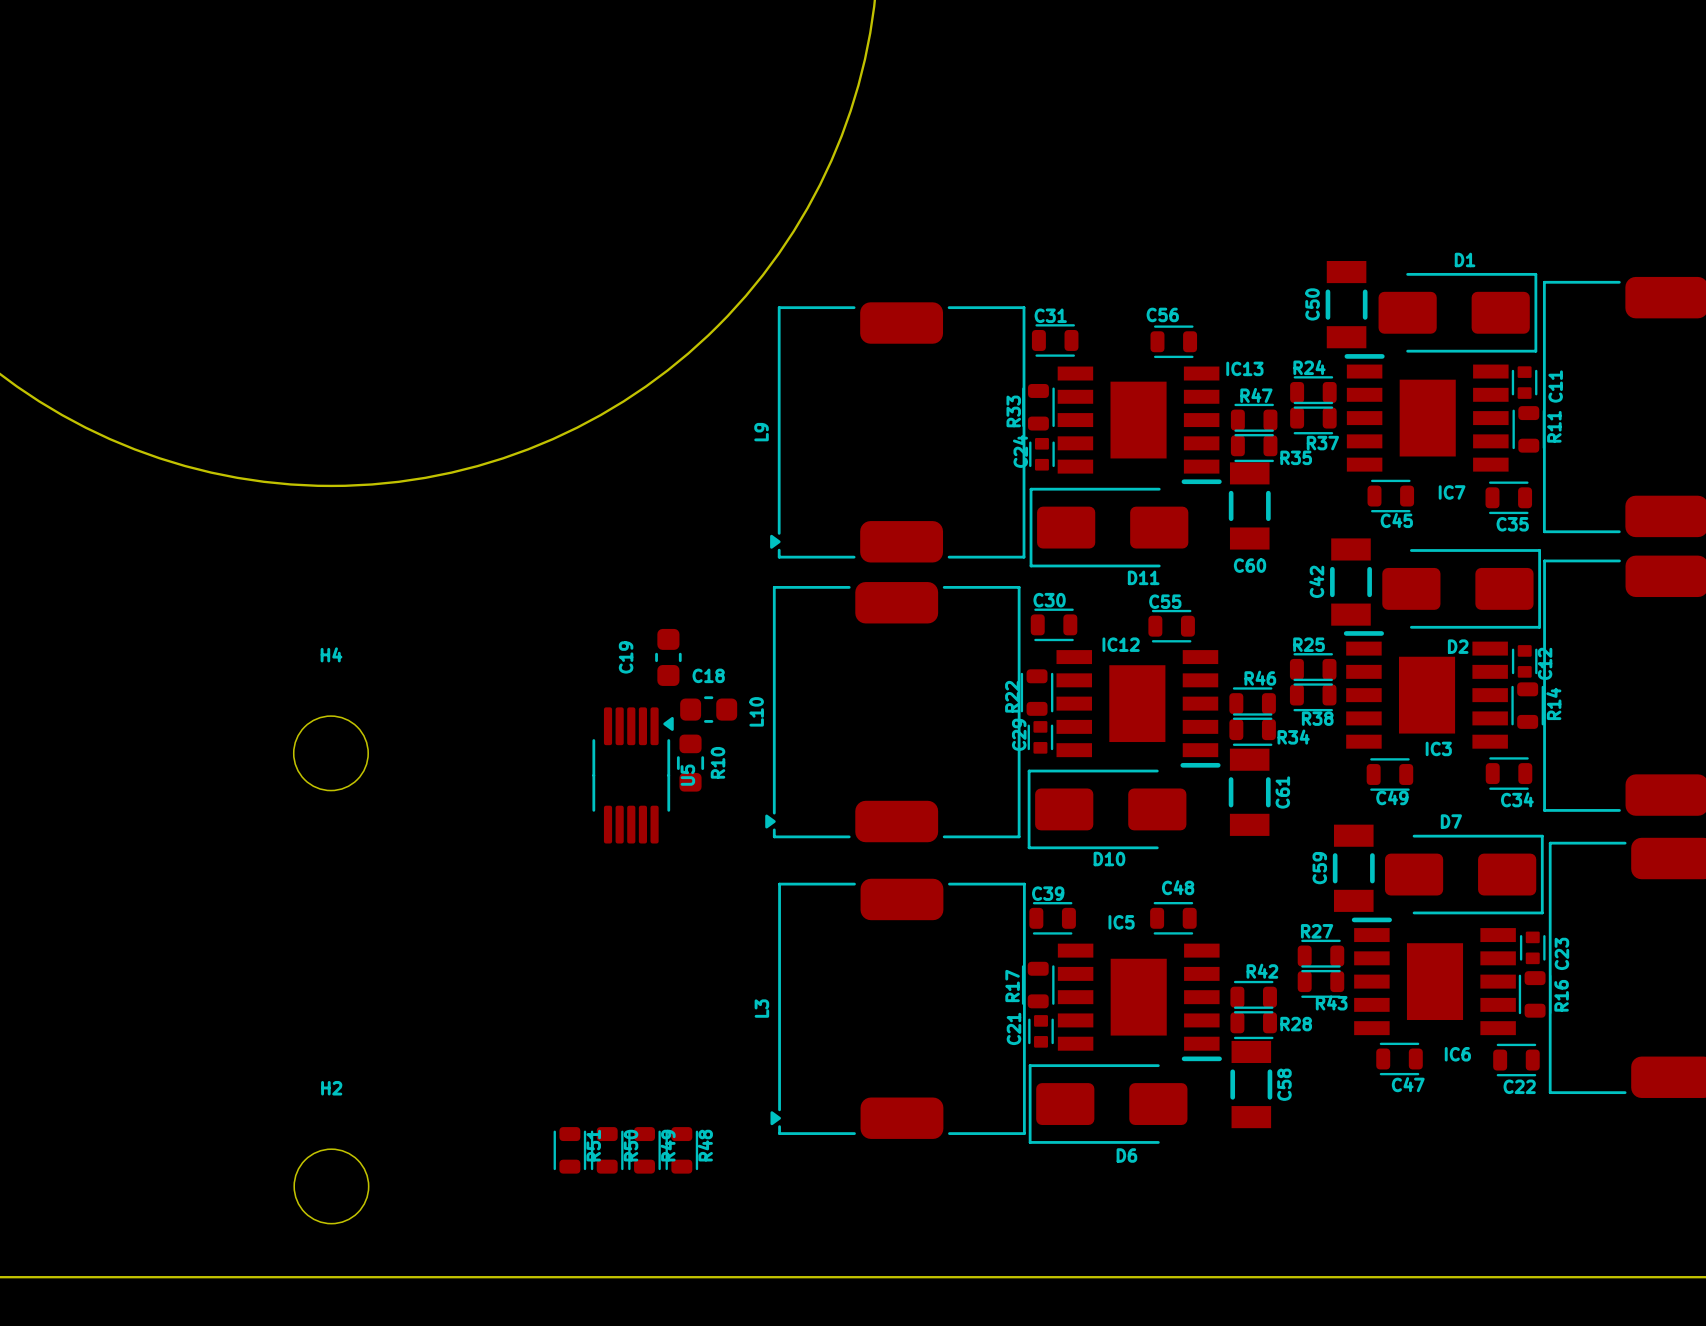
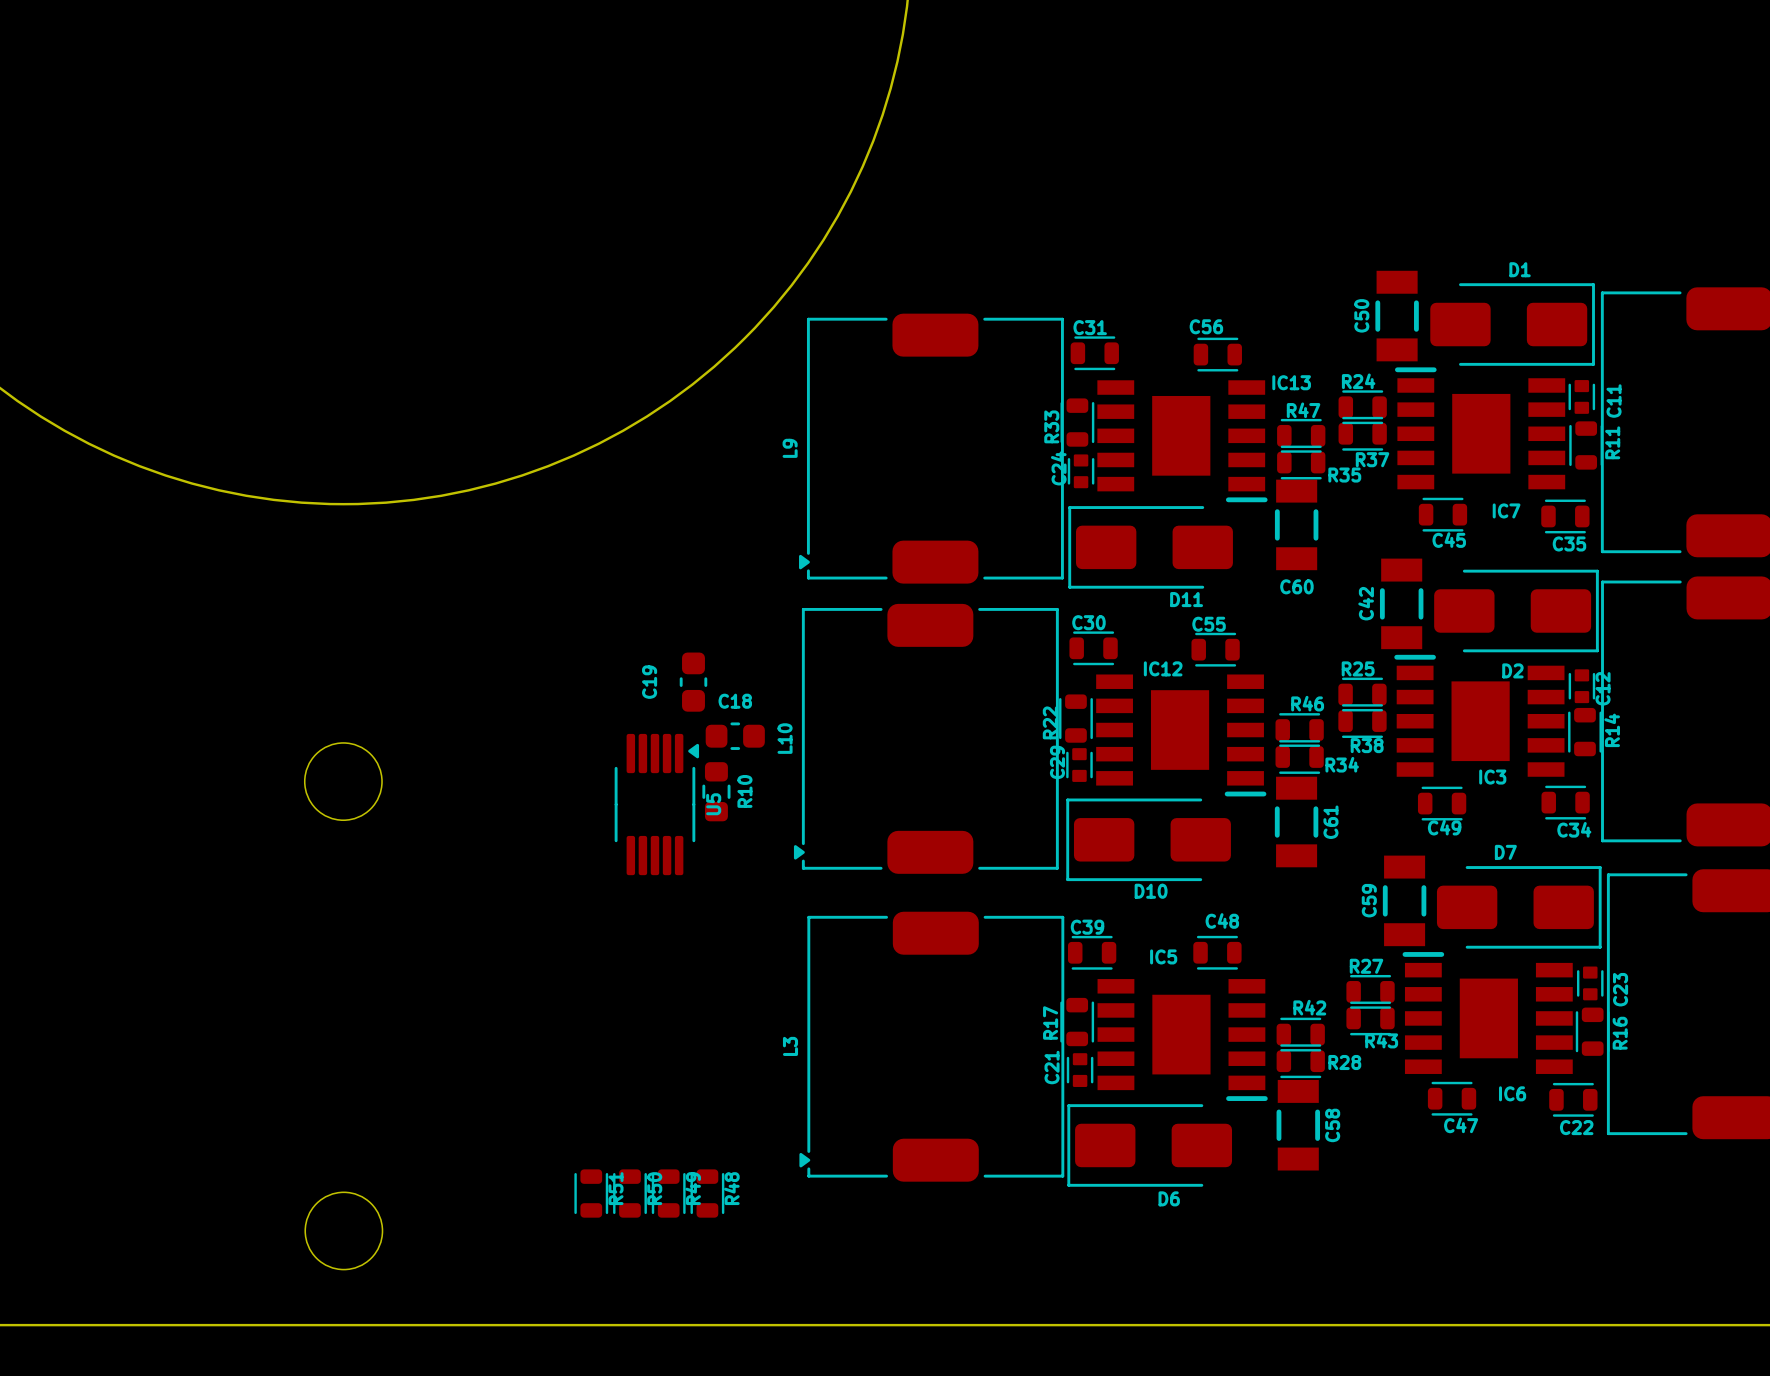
H4 name: H4 (331, 654) -> none
H2 name: H2 (331, 1088) -> none

